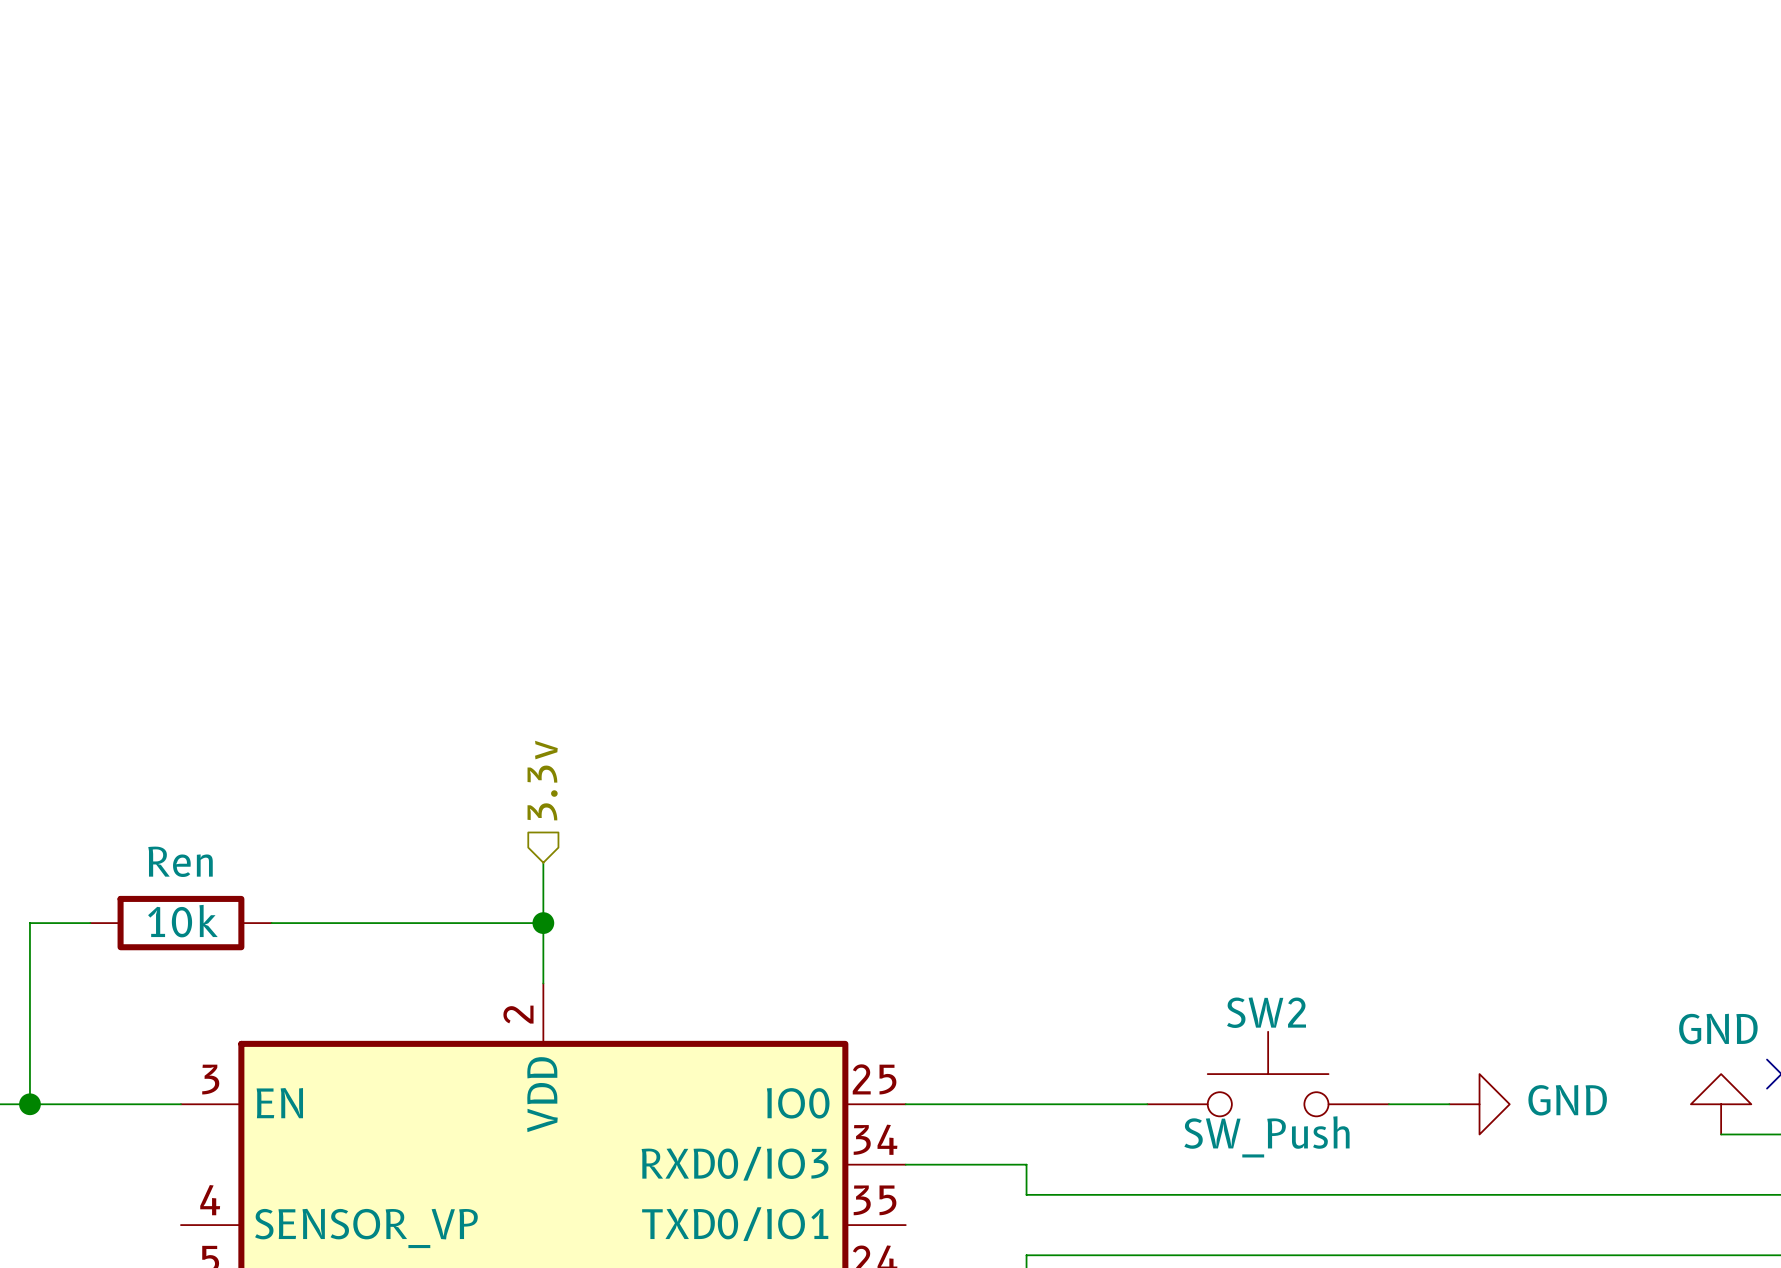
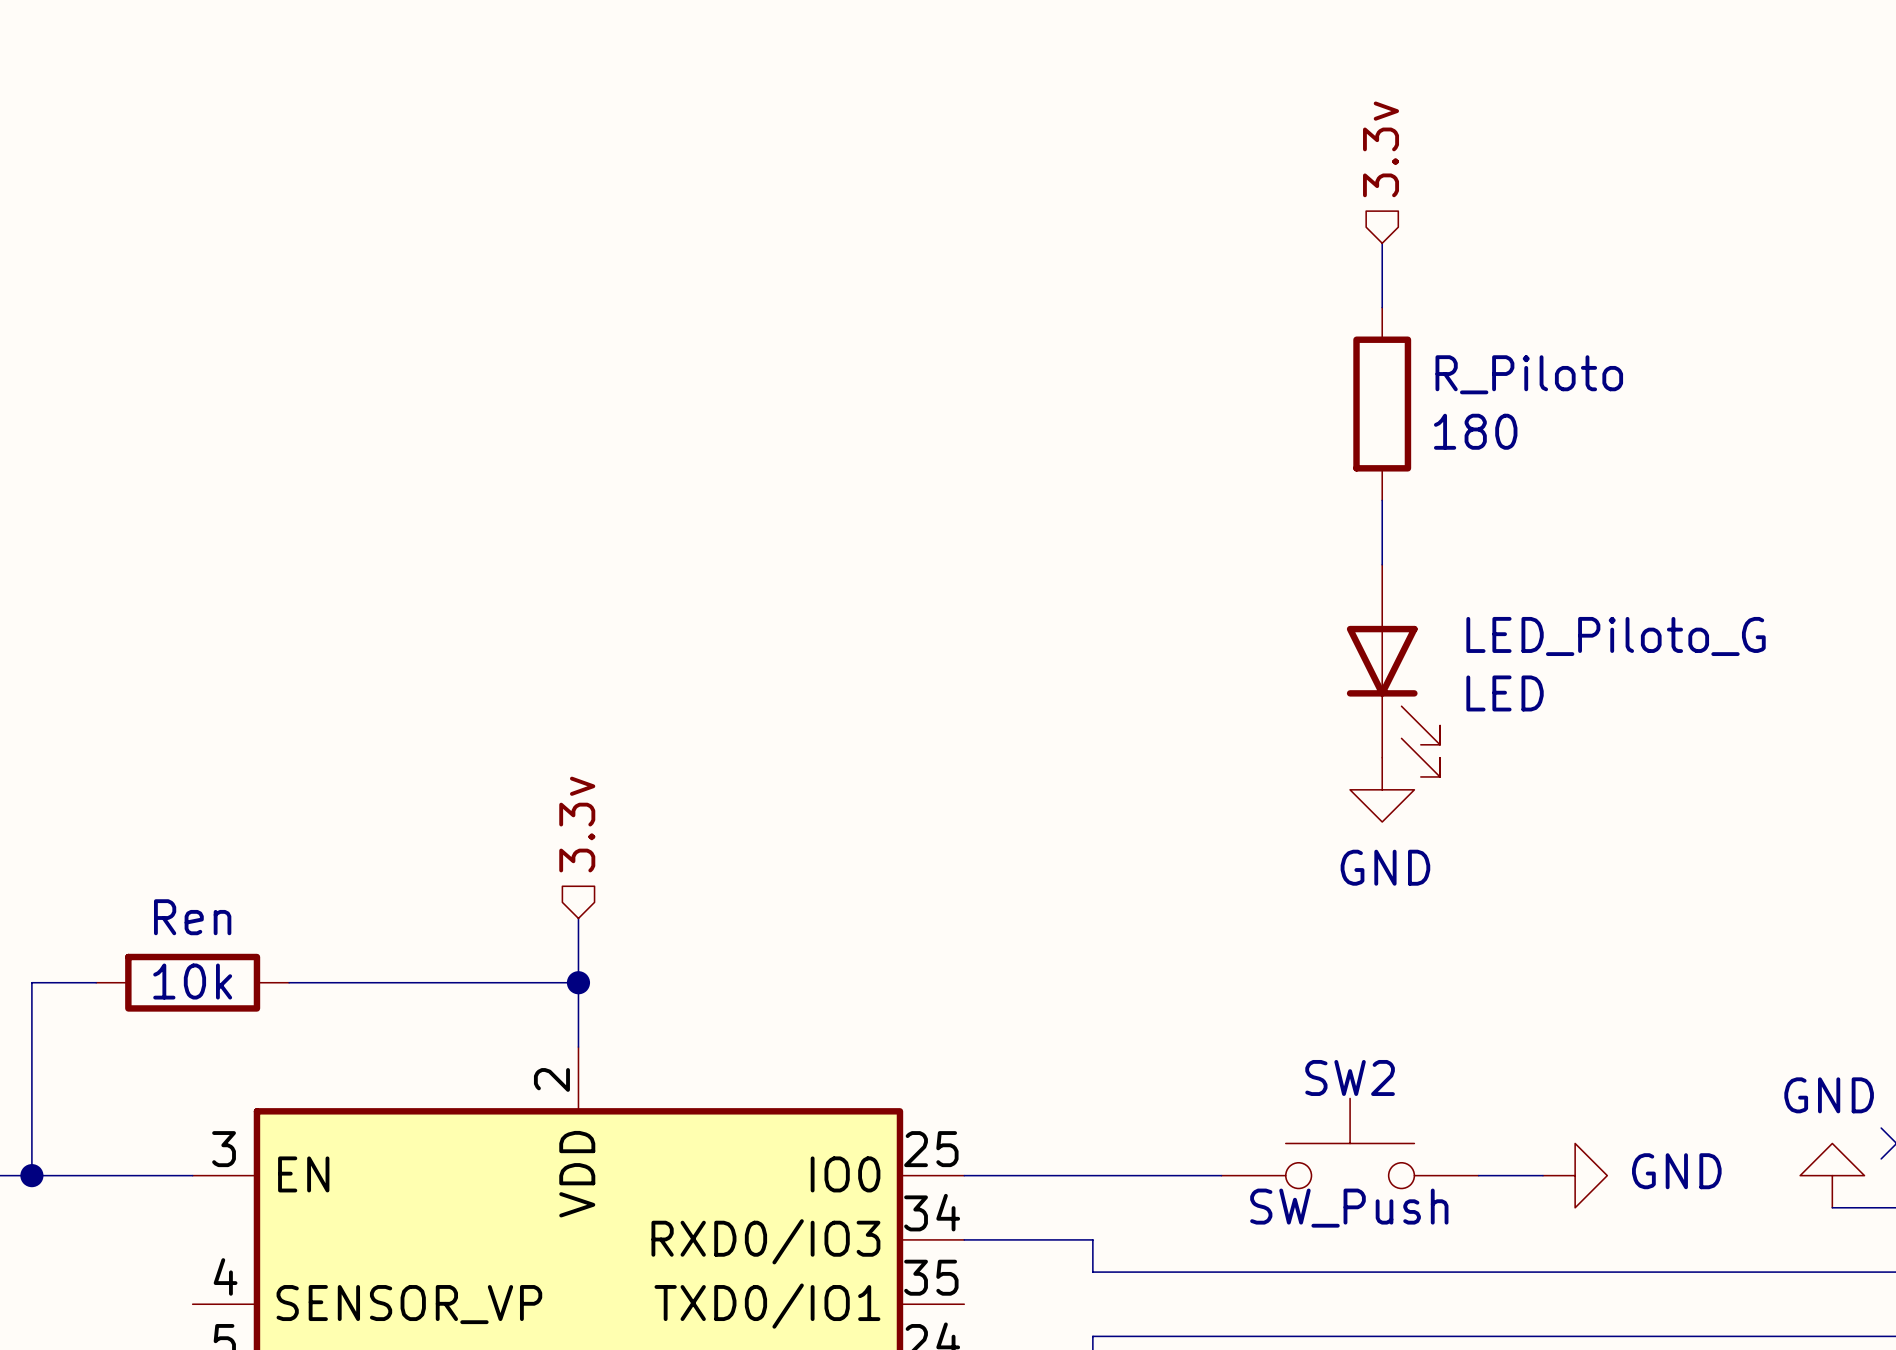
hierarchical label: none -> 3.3v (1381, 149)
wire: none -> (1382, 243) (1382, 307)
R_Piloto: none -> 180 (1382, 404)
wire: none -> (1382, 500) (1382, 564)
LED_Piloto_G: none -> LED (1393, 670)
power symbol: none -> GND (1382, 789)

